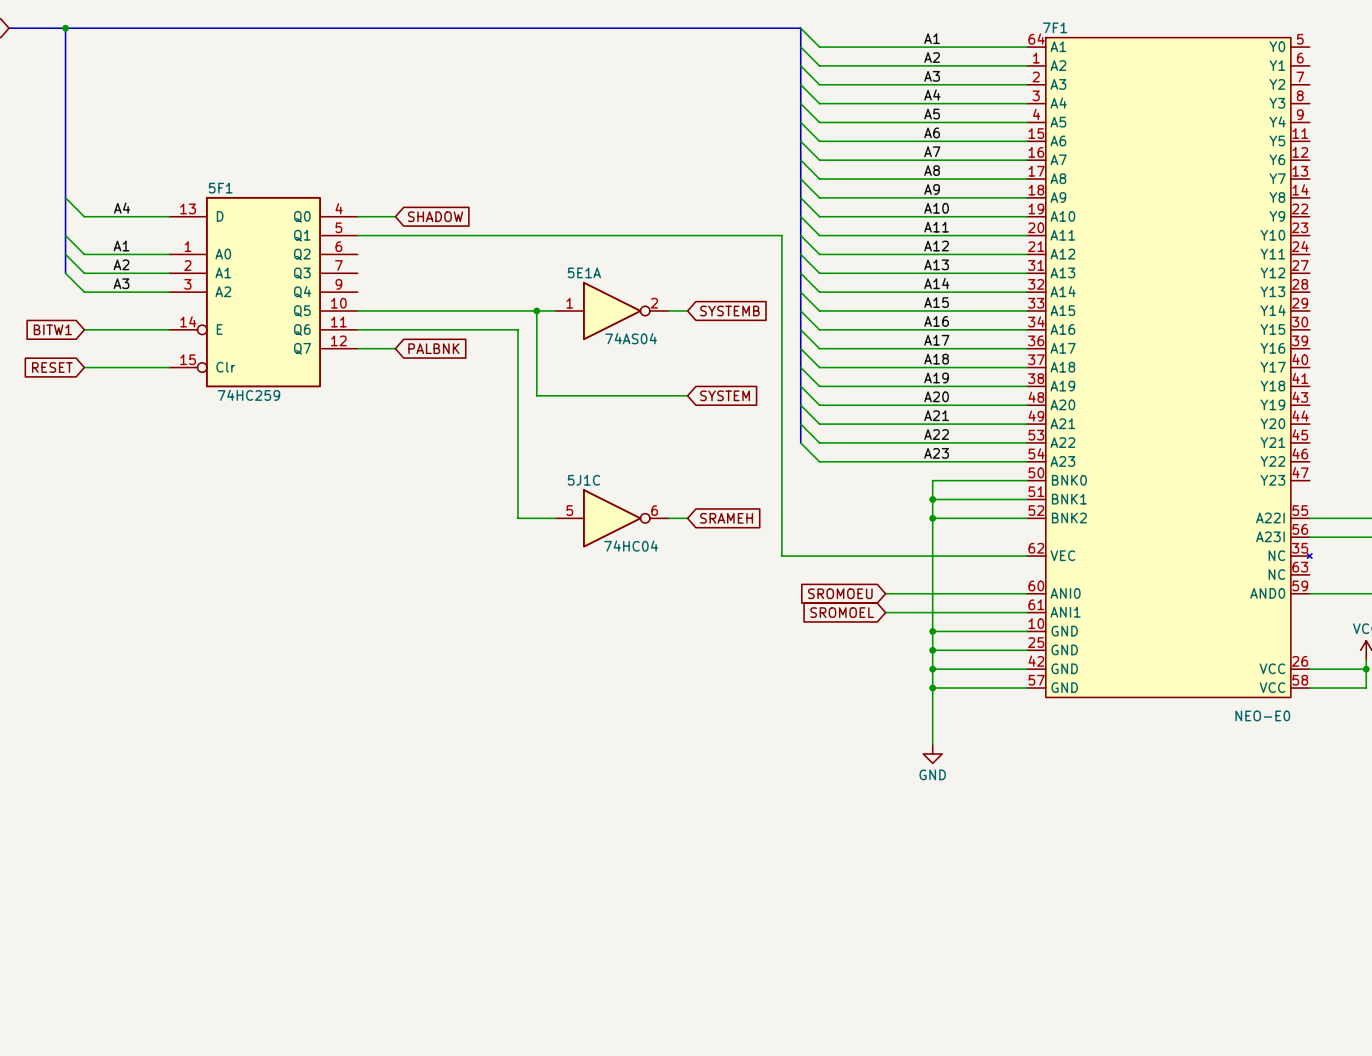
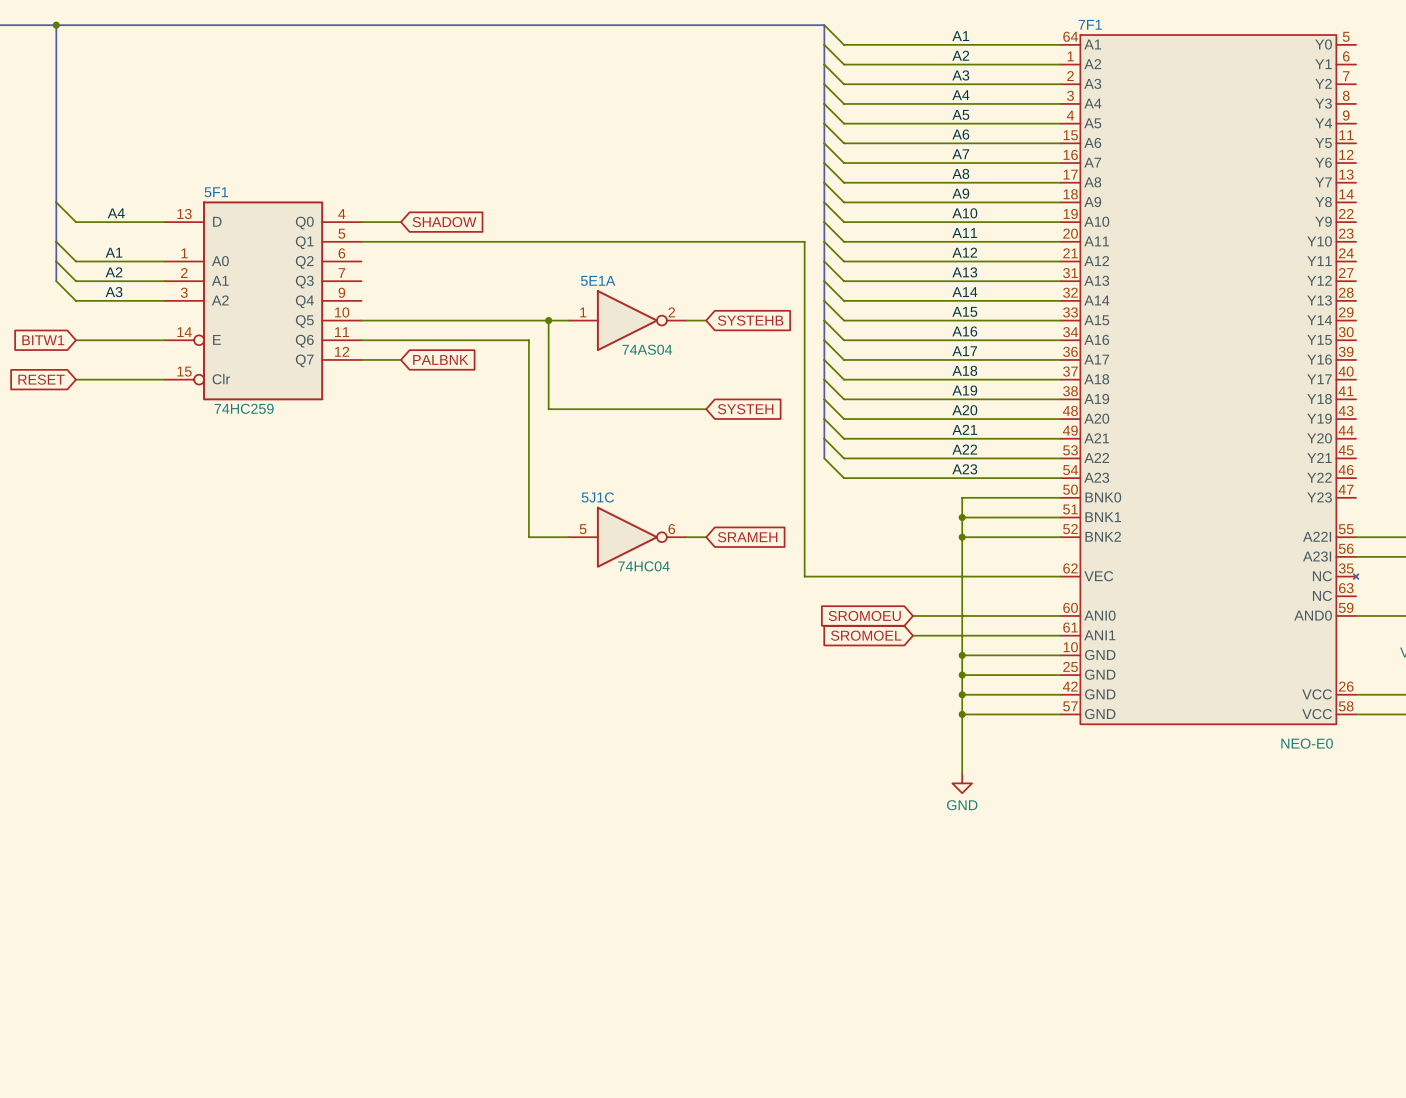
global label: SYSTEMB (729, 310) -> SYSTEHB (750, 320)
global label: SYSTEM (725, 395) -> SYSTEH (745, 409)

